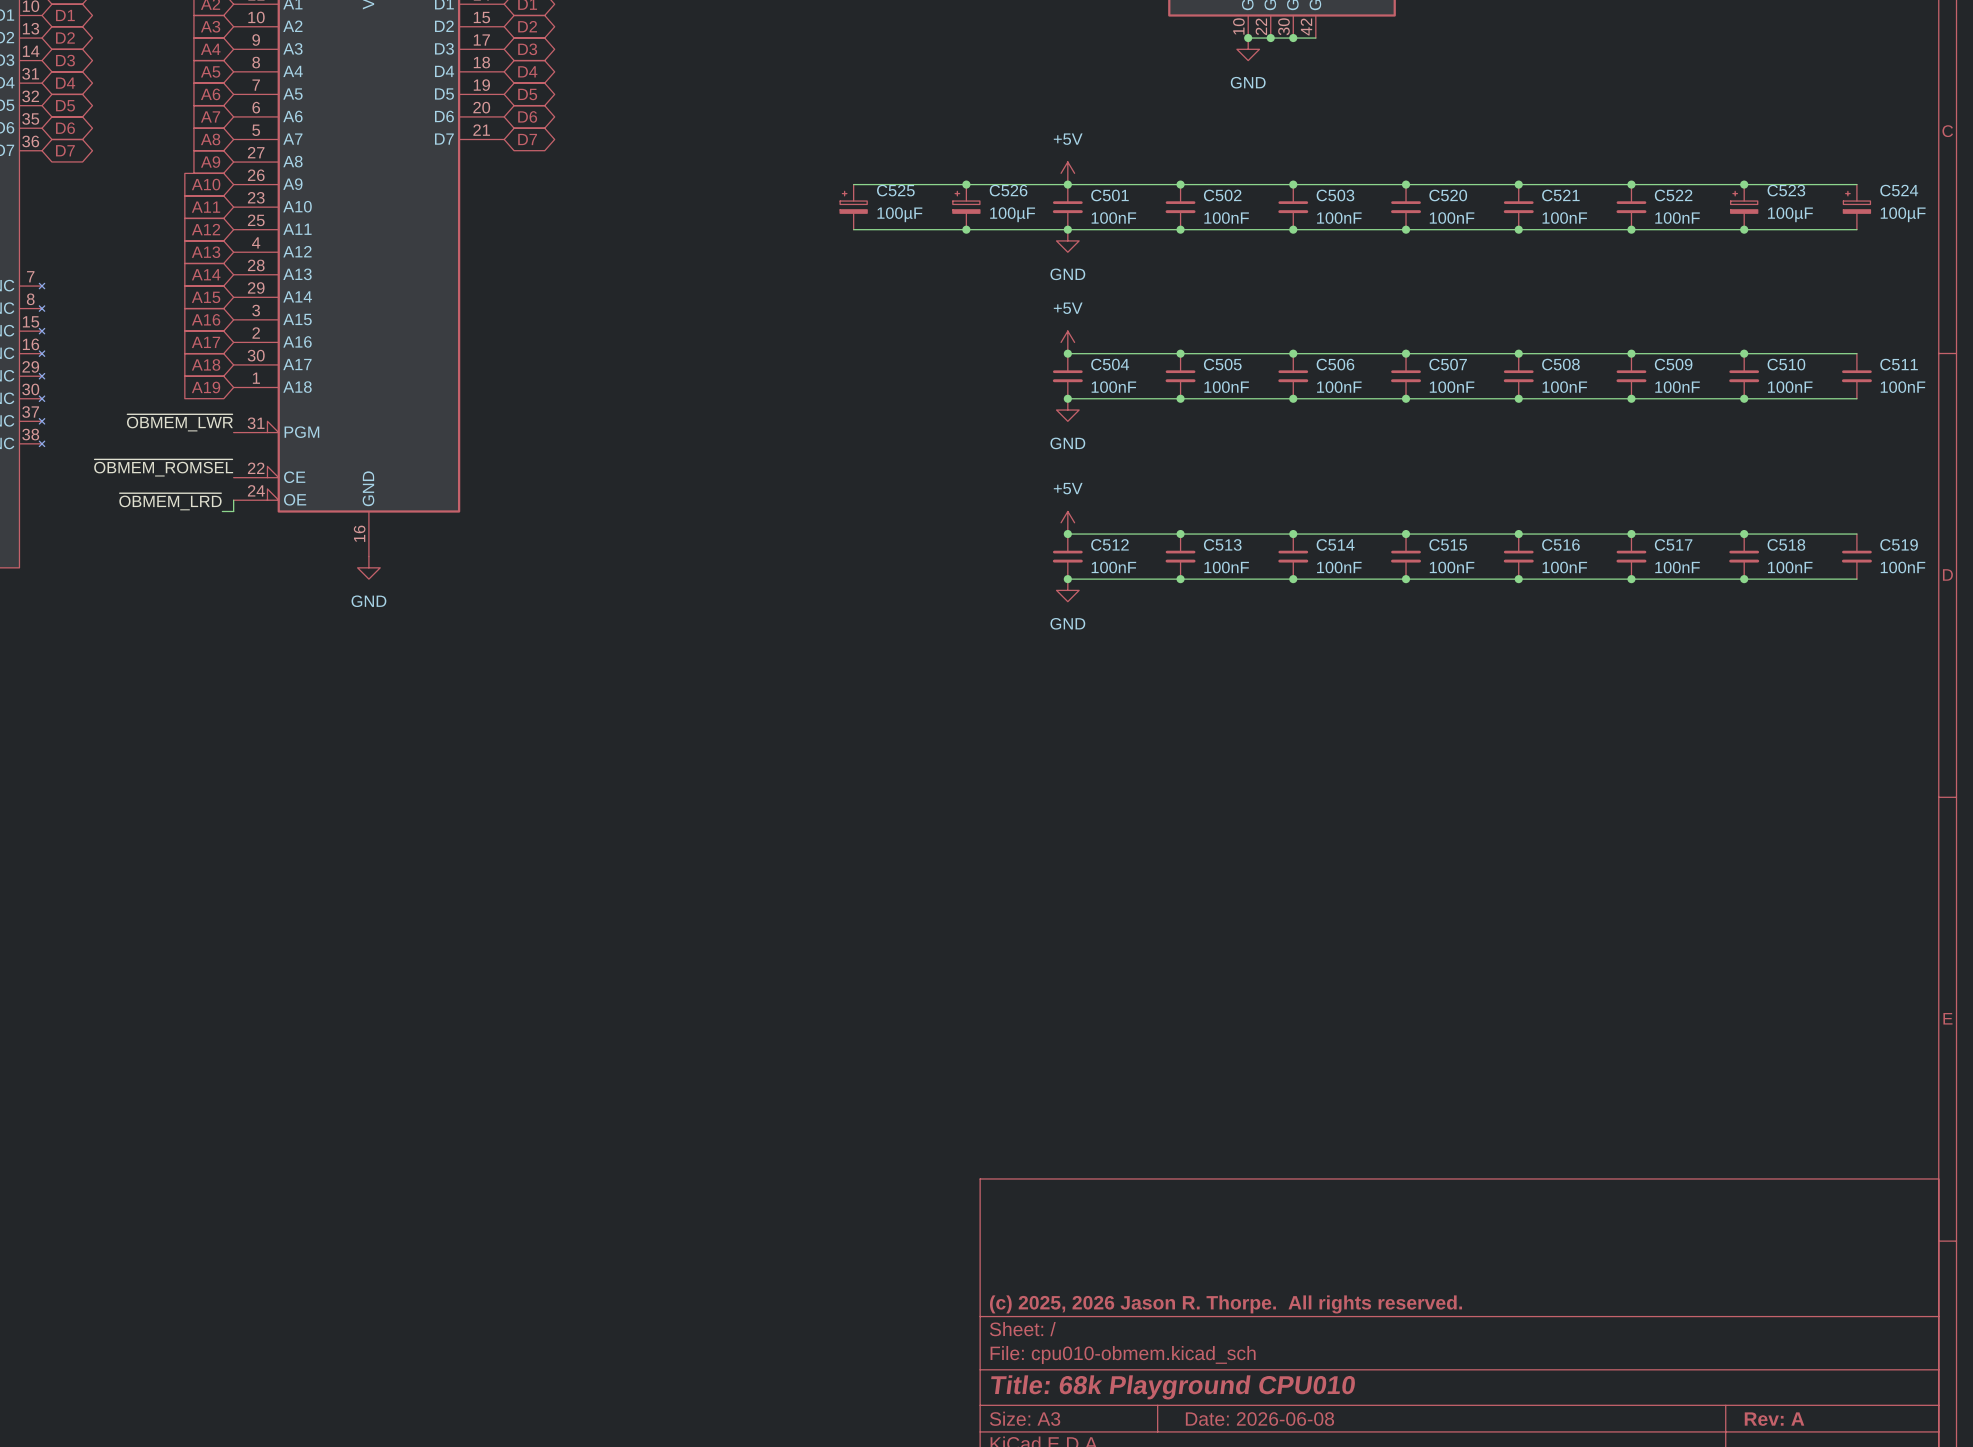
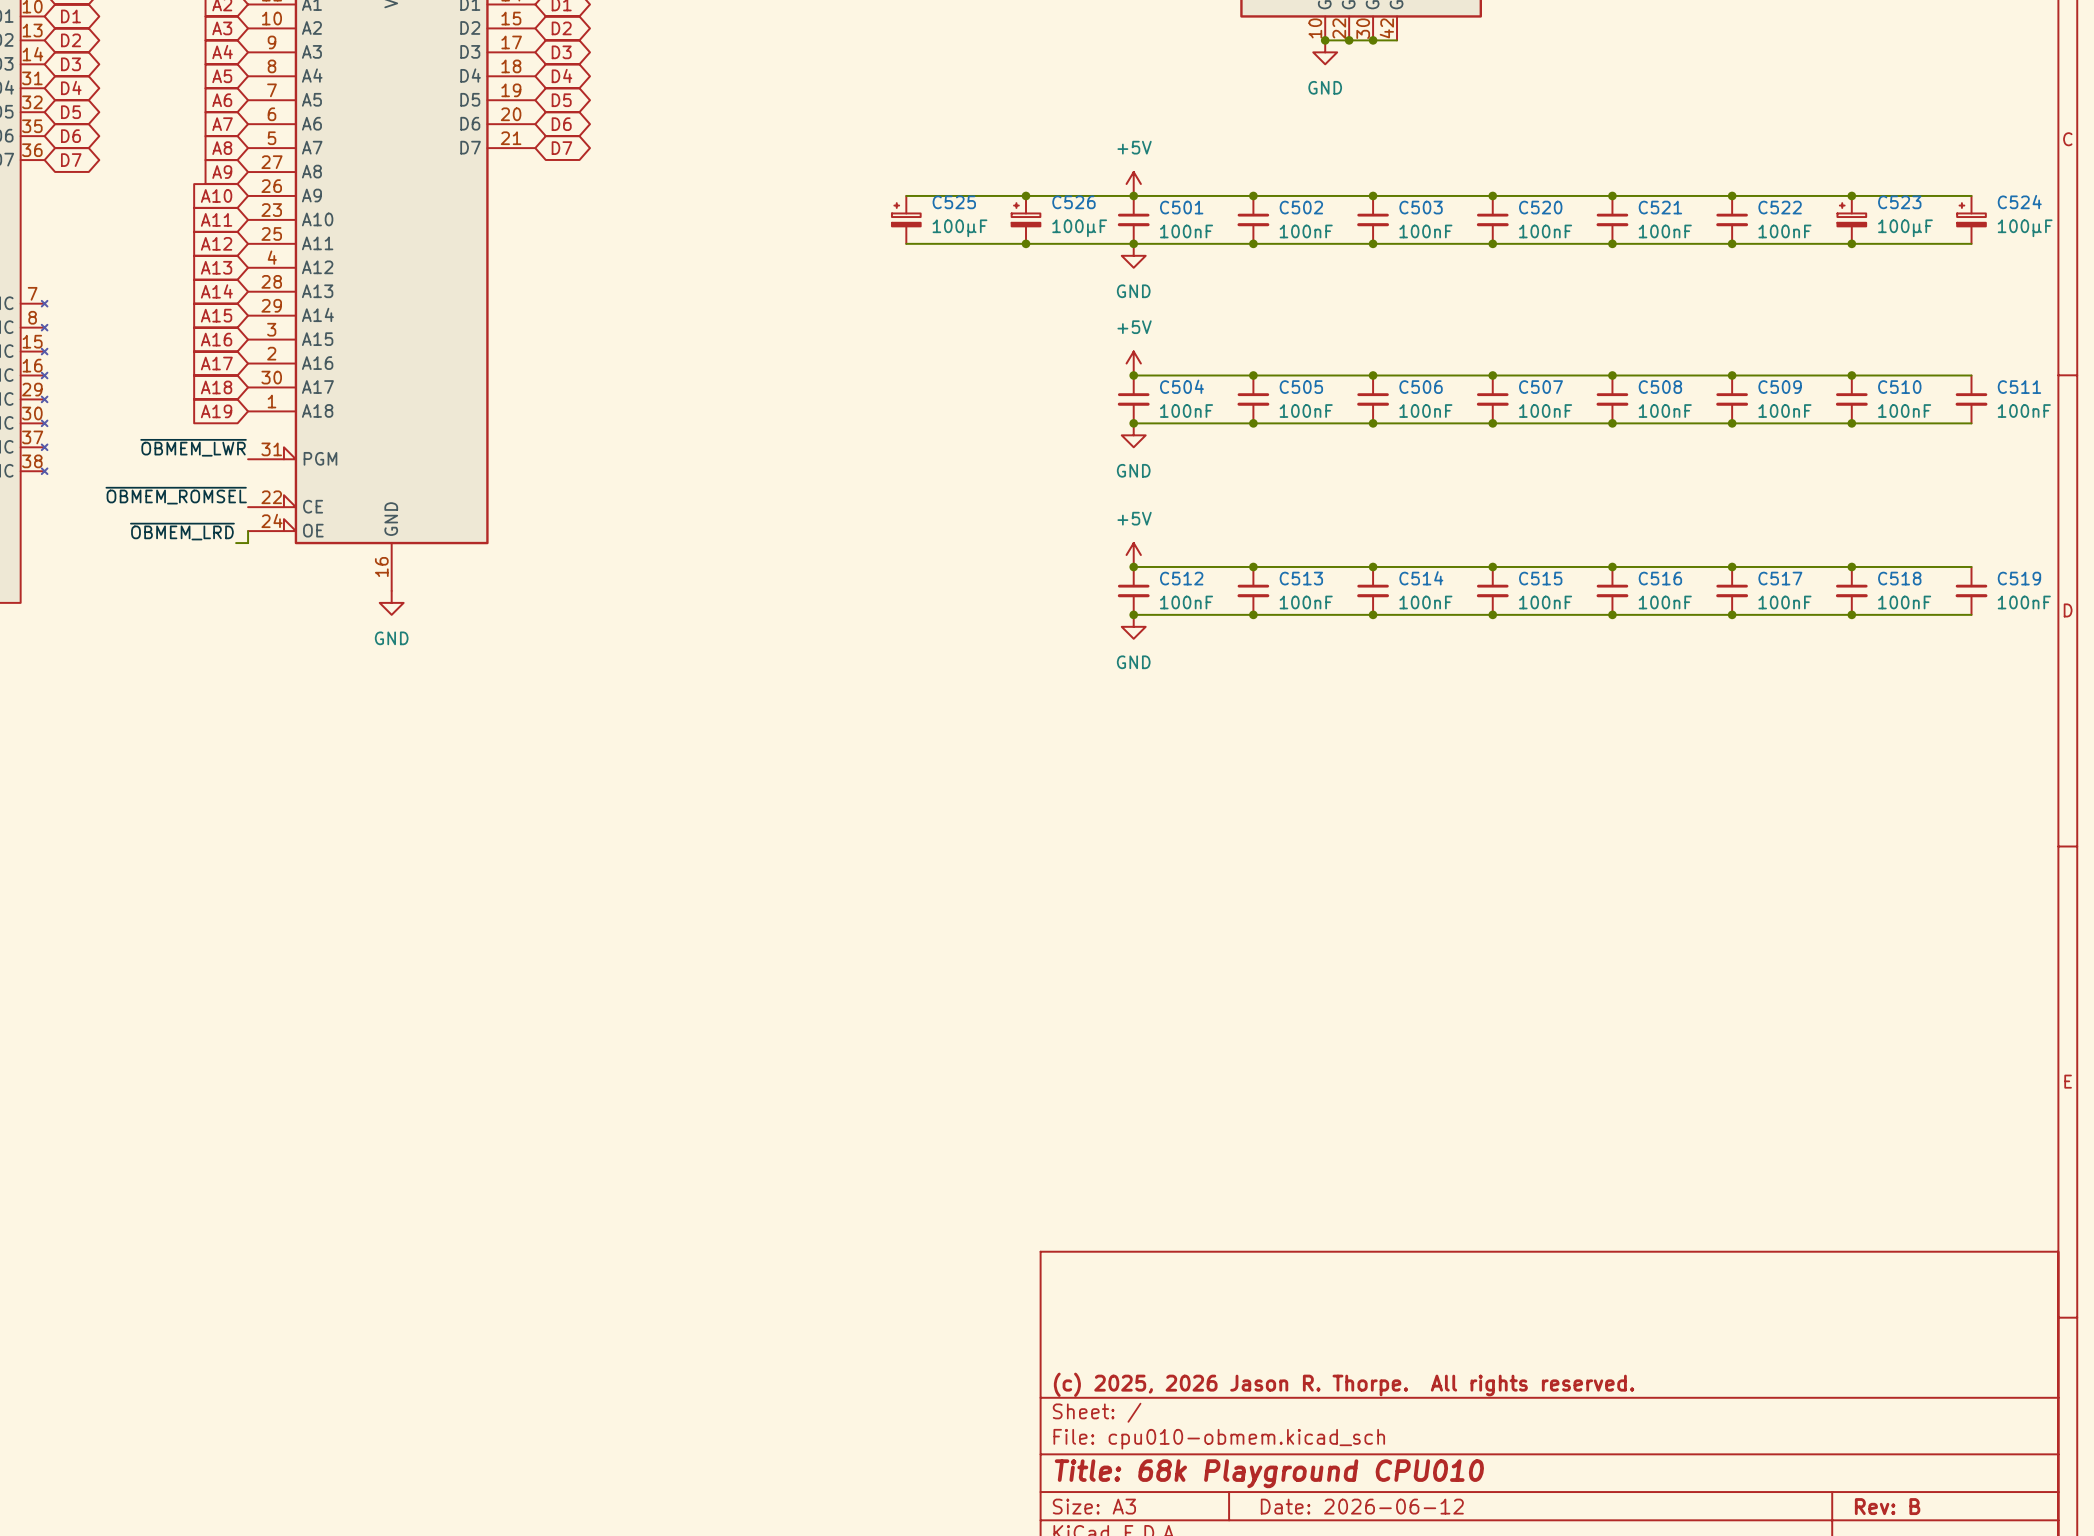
title block: Date: 2026-06-08 (1259, 1419) -> Date: 2026-06-12 (1362, 1506)
title block: Rev: A (1774, 1419) -> Rev: B (1887, 1506)

